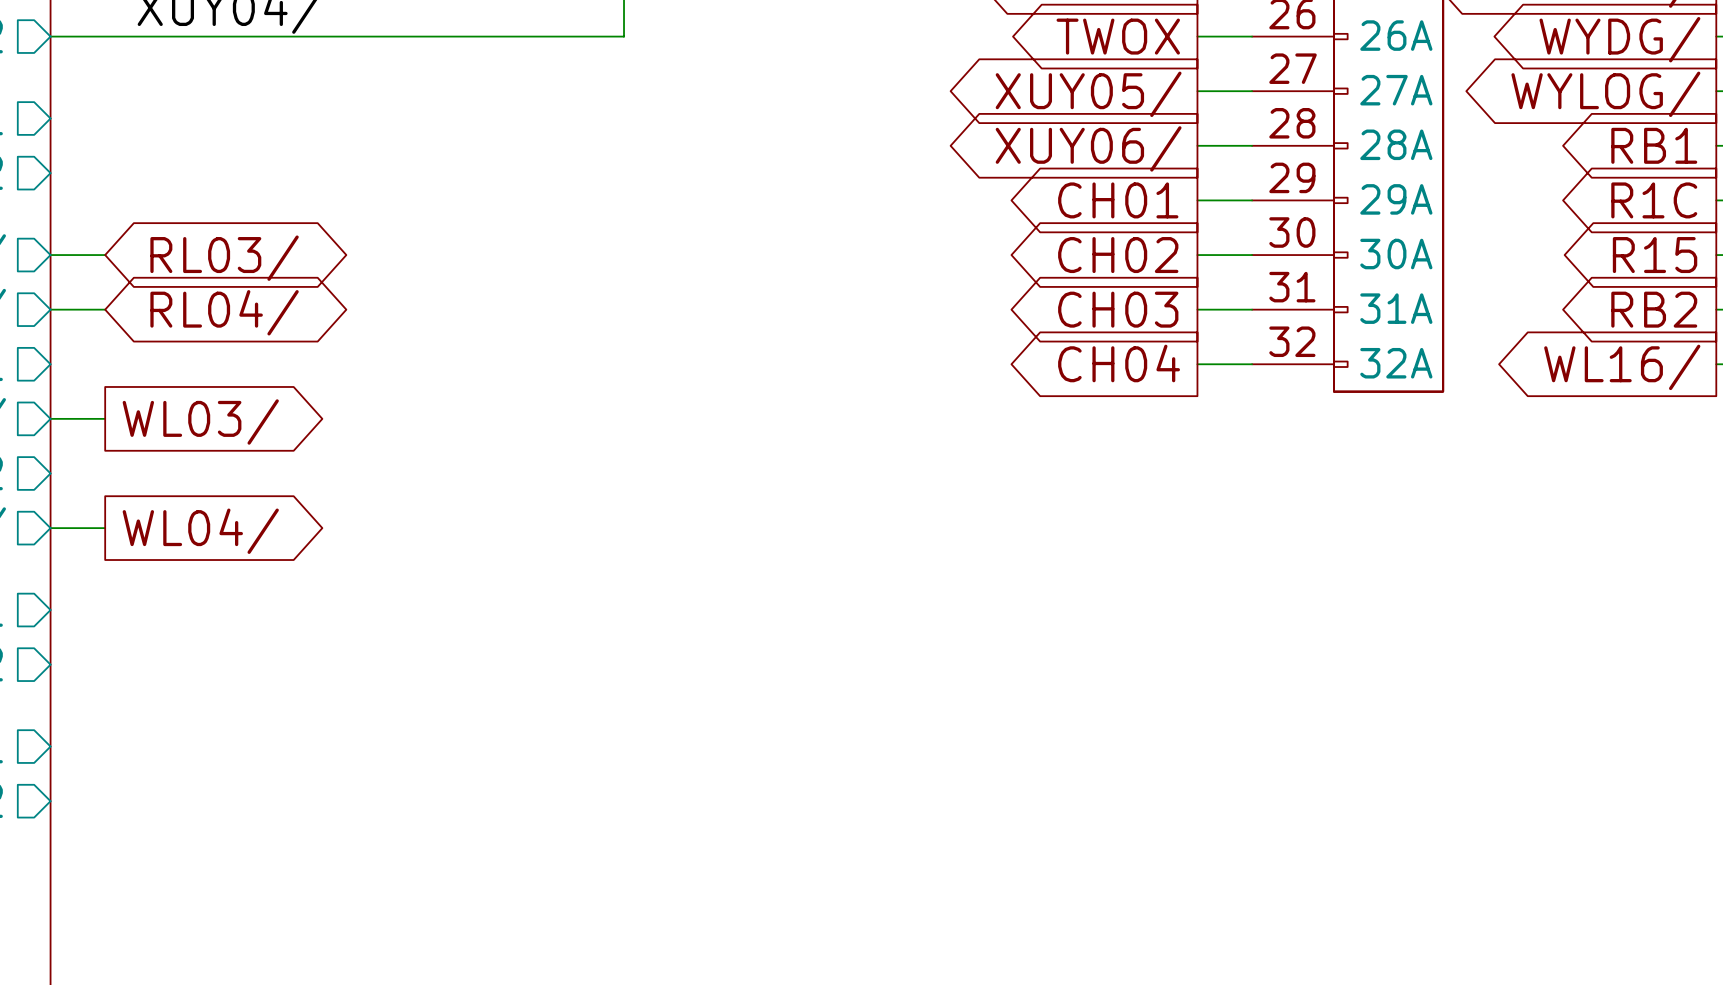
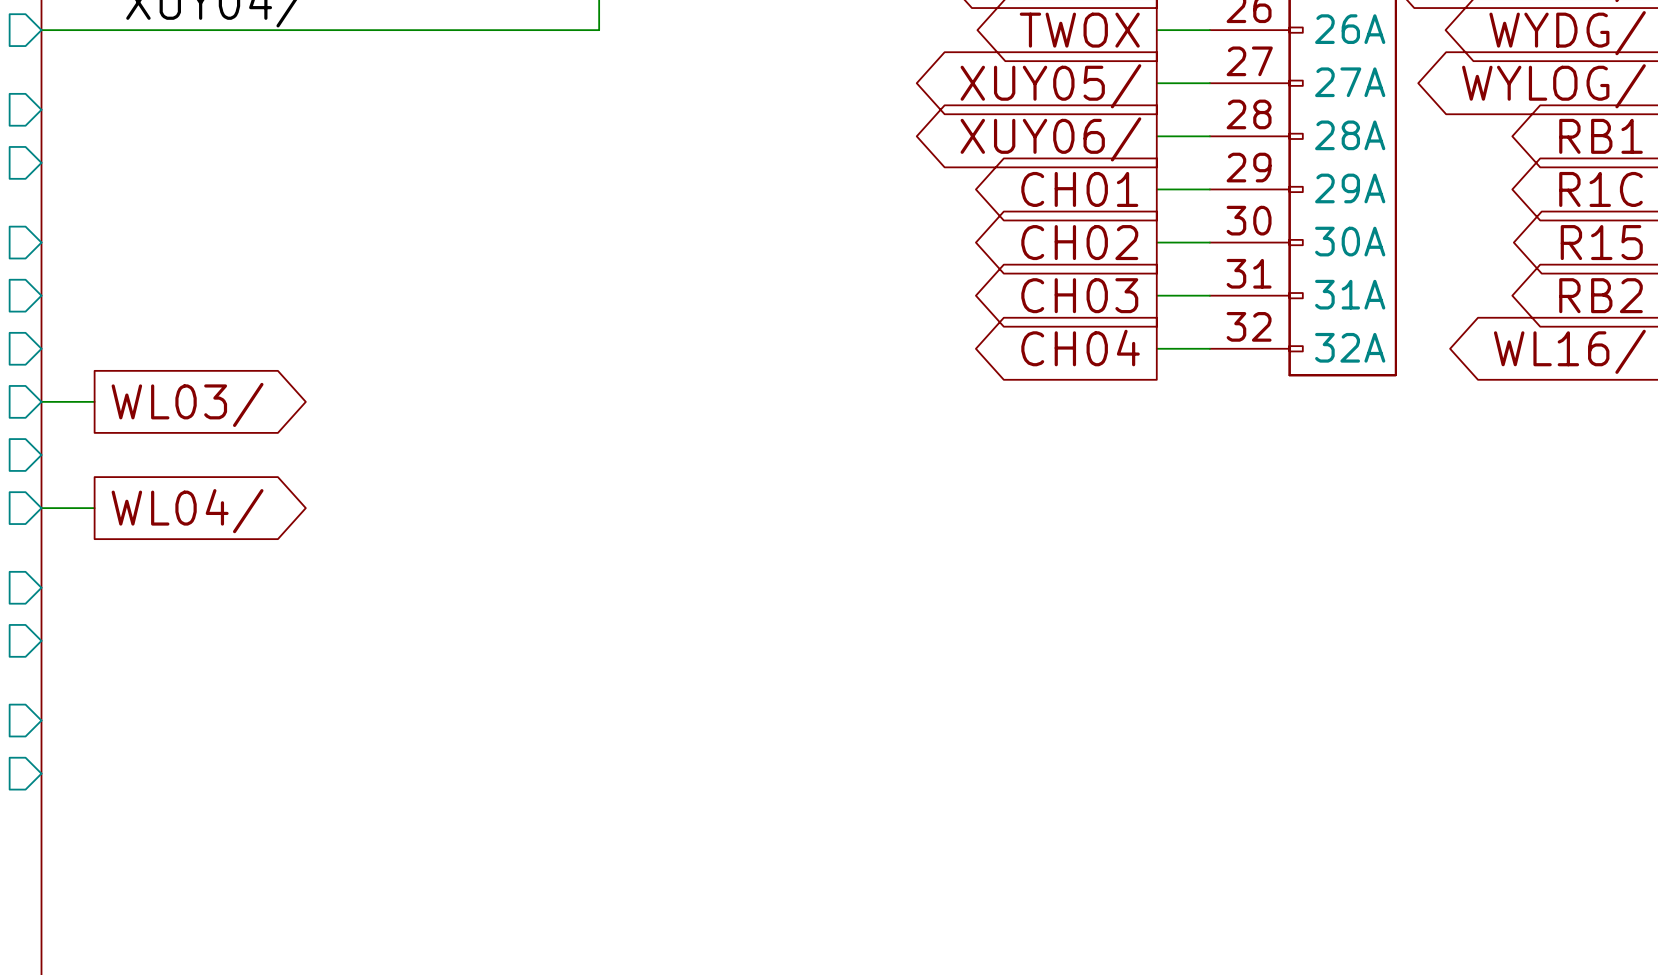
wire: (50, 255) (105, 255) -> none
global label: RL03/ (224, 258) -> none
wire: (50, 309) (105, 309) -> none
global label: RL04/ (224, 312) -> none

